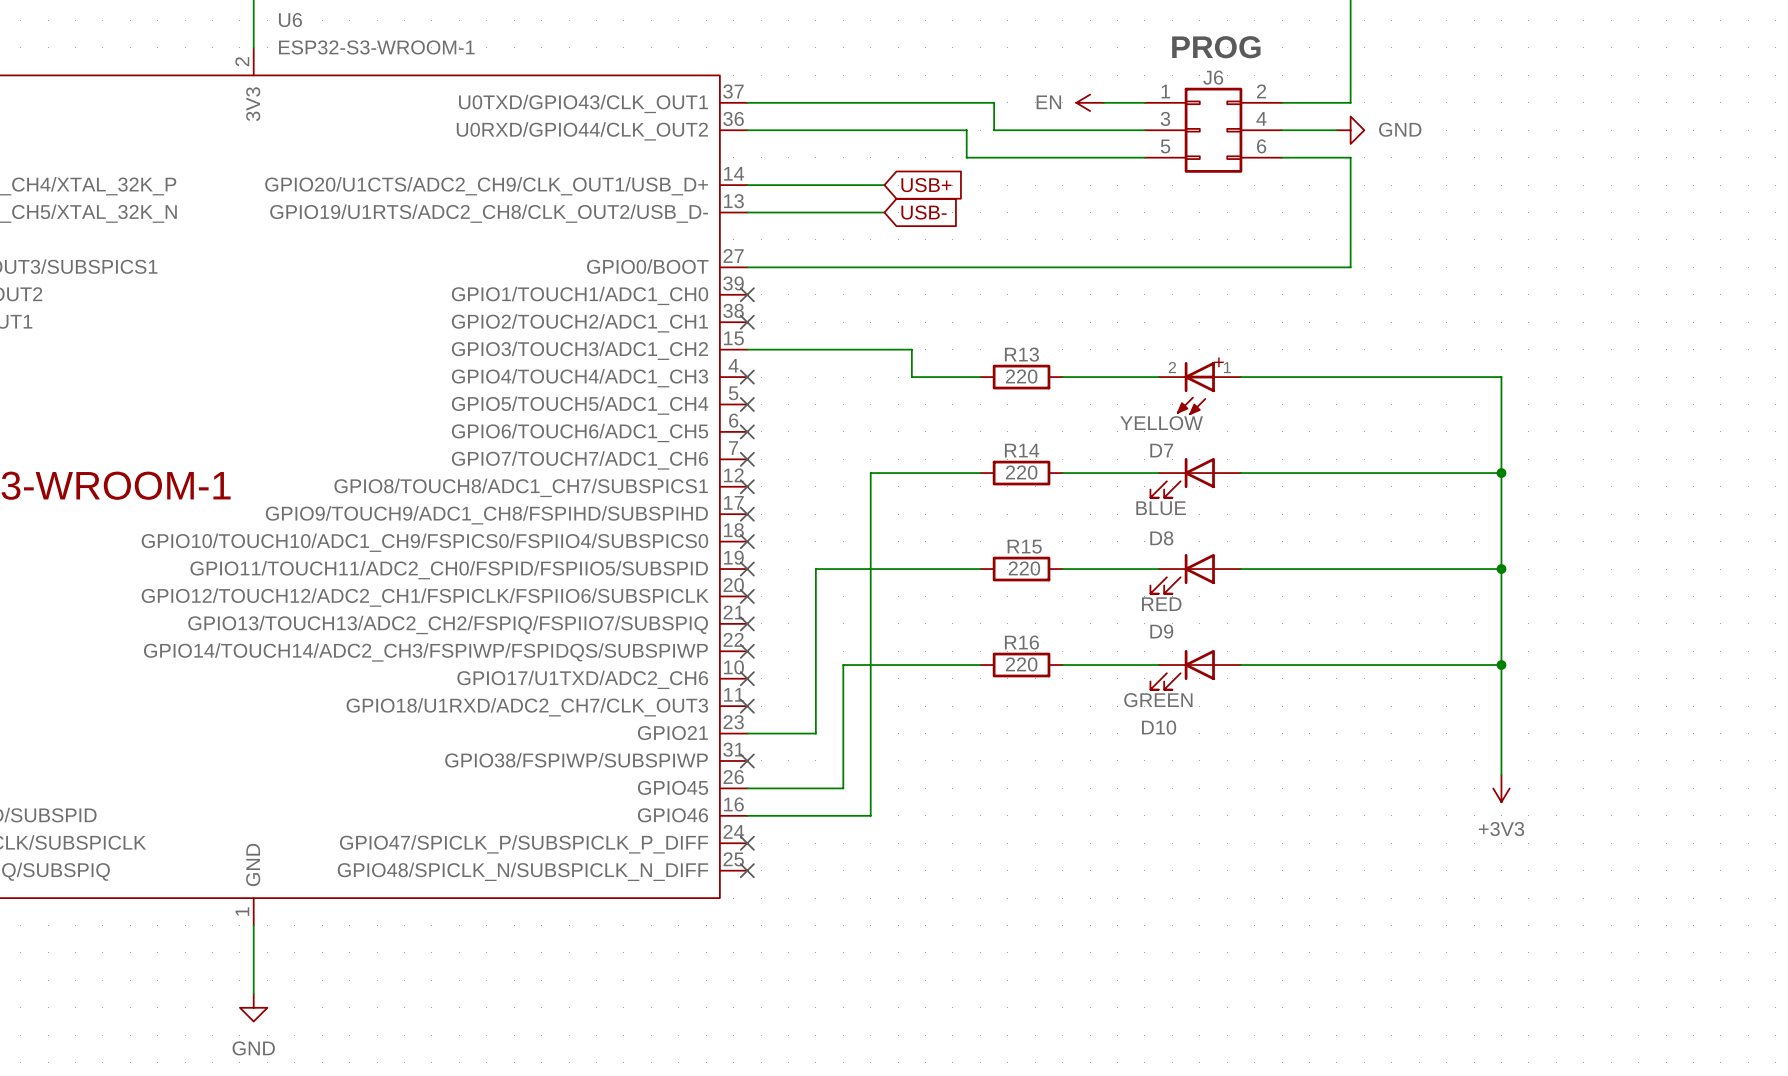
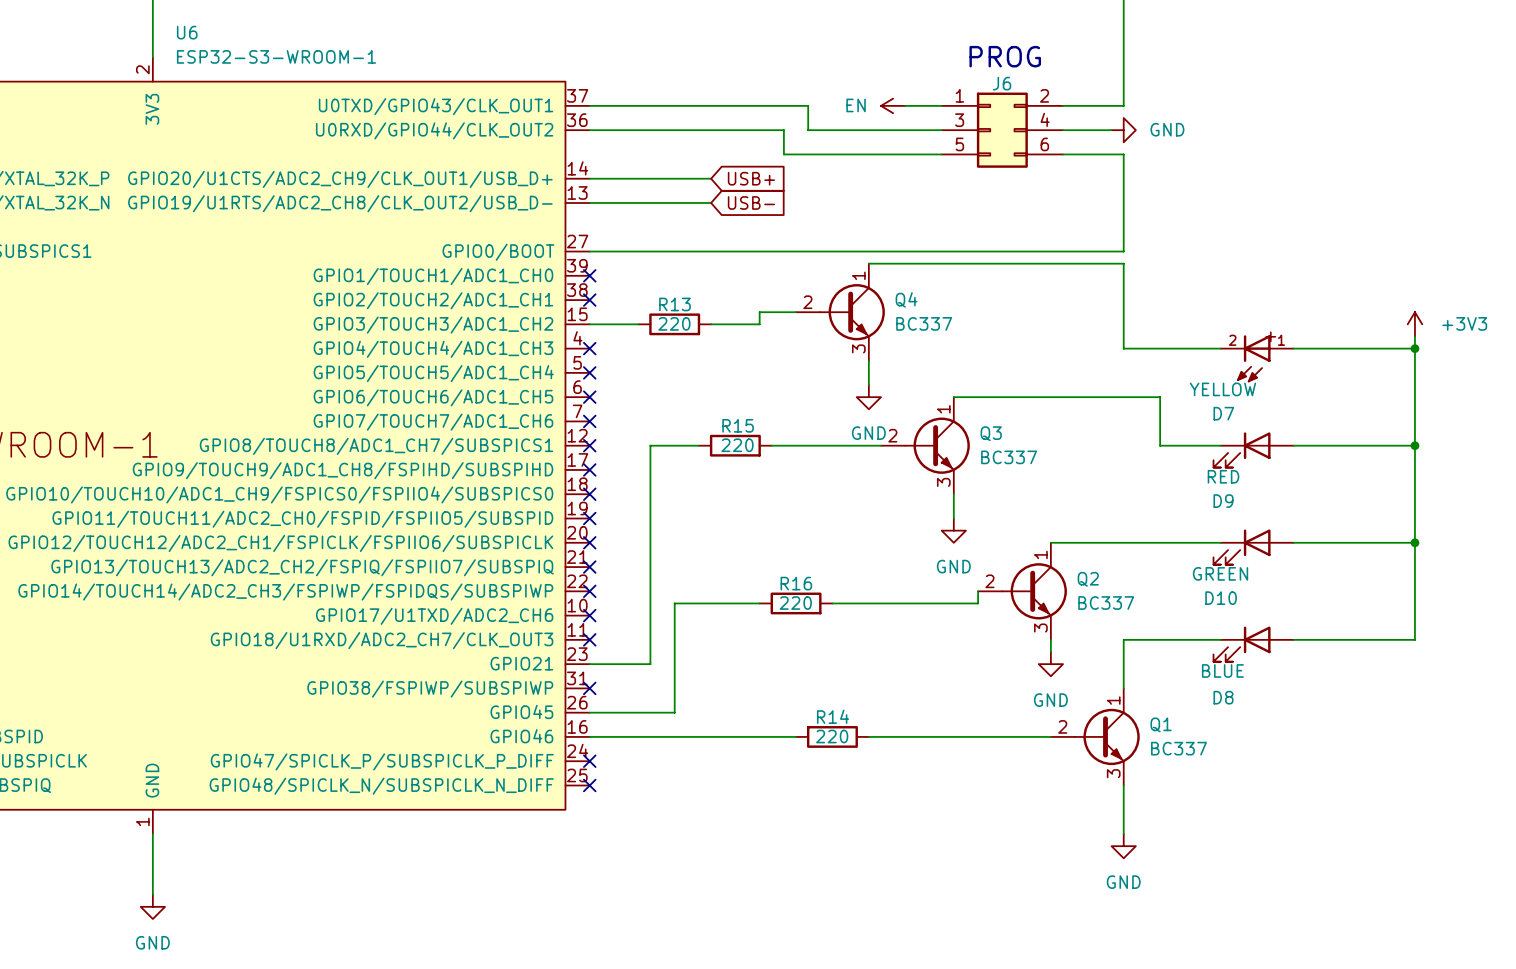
Q4: none -> BC337 (840, 312)
wire: (802, 349) (884, 349) -> none
wire: (911, 349) (911, 377) (980, 377) -> (735, 324) (759, 324) (759, 312) (796, 312)
power symbol: none -> +3V3 (1414, 324)
wire: none -> (1414, 336) (1414, 639) (1293, 639)
R13 position: (1021, 377) -> (674, 324)
wire: (1062, 377) (1158, 377) -> none
wire: (1240, 377) (1350, 377) -> (868, 263) (1123, 263) (1123, 348)
wire: (1460, 377) (1501, 377) (1501, 774) -> none
wire: none -> (1293, 348) (1414, 348)
junction: none -> (1414, 348)
D7 position: (1199, 388) -> (1257, 358)
wire: none -> (868, 360) (868, 385)
power symbol: none -> GND (868, 397)
wire: none -> (953, 397) (1160, 397) (1160, 445) (1220, 445)
wire: (980, 473) (870, 473) (870, 815) -> (796, 736) (698, 736)
R14 position: (1021, 473) -> (832, 736)
wire: (1062, 473) (1158, 473) -> none
wire: (1240, 473) (1501, 473) -> none
junction: (1501, 473) -> none
D8 position: (1195, 477) -> (1253, 644)
wire: none -> (771, 445) (881, 445)
Q3: none -> BC337 (925, 445)
wire: none -> (1293, 445) (1414, 445)
junction: none -> (1414, 445)
wire: (815, 569) (980, 569) -> (650, 518) (650, 445) (698, 445)
R15 position: (1021, 569) -> (735, 445)
wire: (1062, 569) (1158, 569) -> (953, 494) (953, 518)
wire: (1240, 569) (1501, 569) -> none
junction: (1501, 569) -> none
D9 position: (1195, 573) -> (1253, 449)
power symbol: none -> GND (953, 530)
wire: none -> (1050, 542) (1220, 542)
wire: none -> (1293, 542) (1414, 542)
junction: none -> (1414, 542)
Q2: none -> BC337 (1022, 591)
wire: (939, 665) (980, 665) -> (832, 603) (868, 603)
R16 position: (1021, 665) -> (796, 603)
wire: (1240, 665) (1501, 665) -> none
junction: (1501, 665) -> none
D10 position: (1195, 669) -> (1253, 547)
wire: none -> (1050, 639) (1050, 652)
wire: none -> (1220, 639) (1123, 639) (1123, 688)
power symbol: none -> GND (1050, 664)
power symbol: +3V3 (1501, 788) -> none
wire: none -> (868, 736) (1050, 736)
Q1: none -> BC337 (1095, 736)
wire: none -> (1123, 785) (1123, 834)
power symbol: none -> GND (1123, 846)

